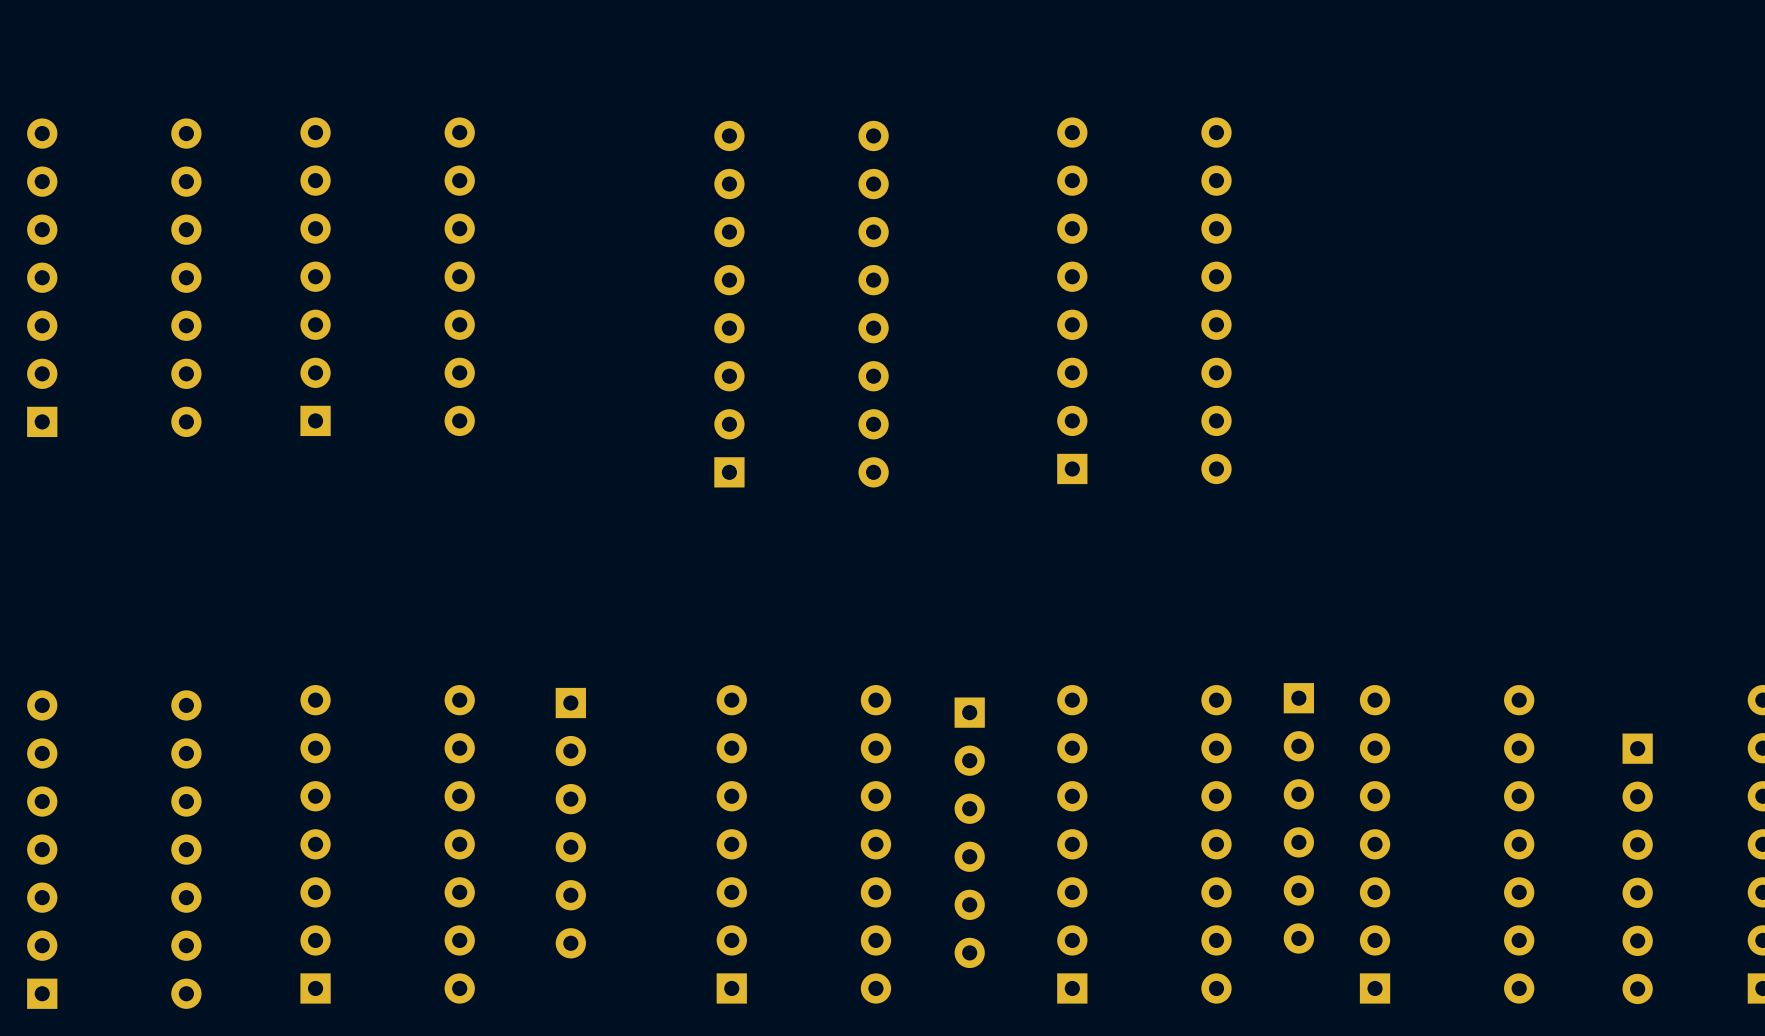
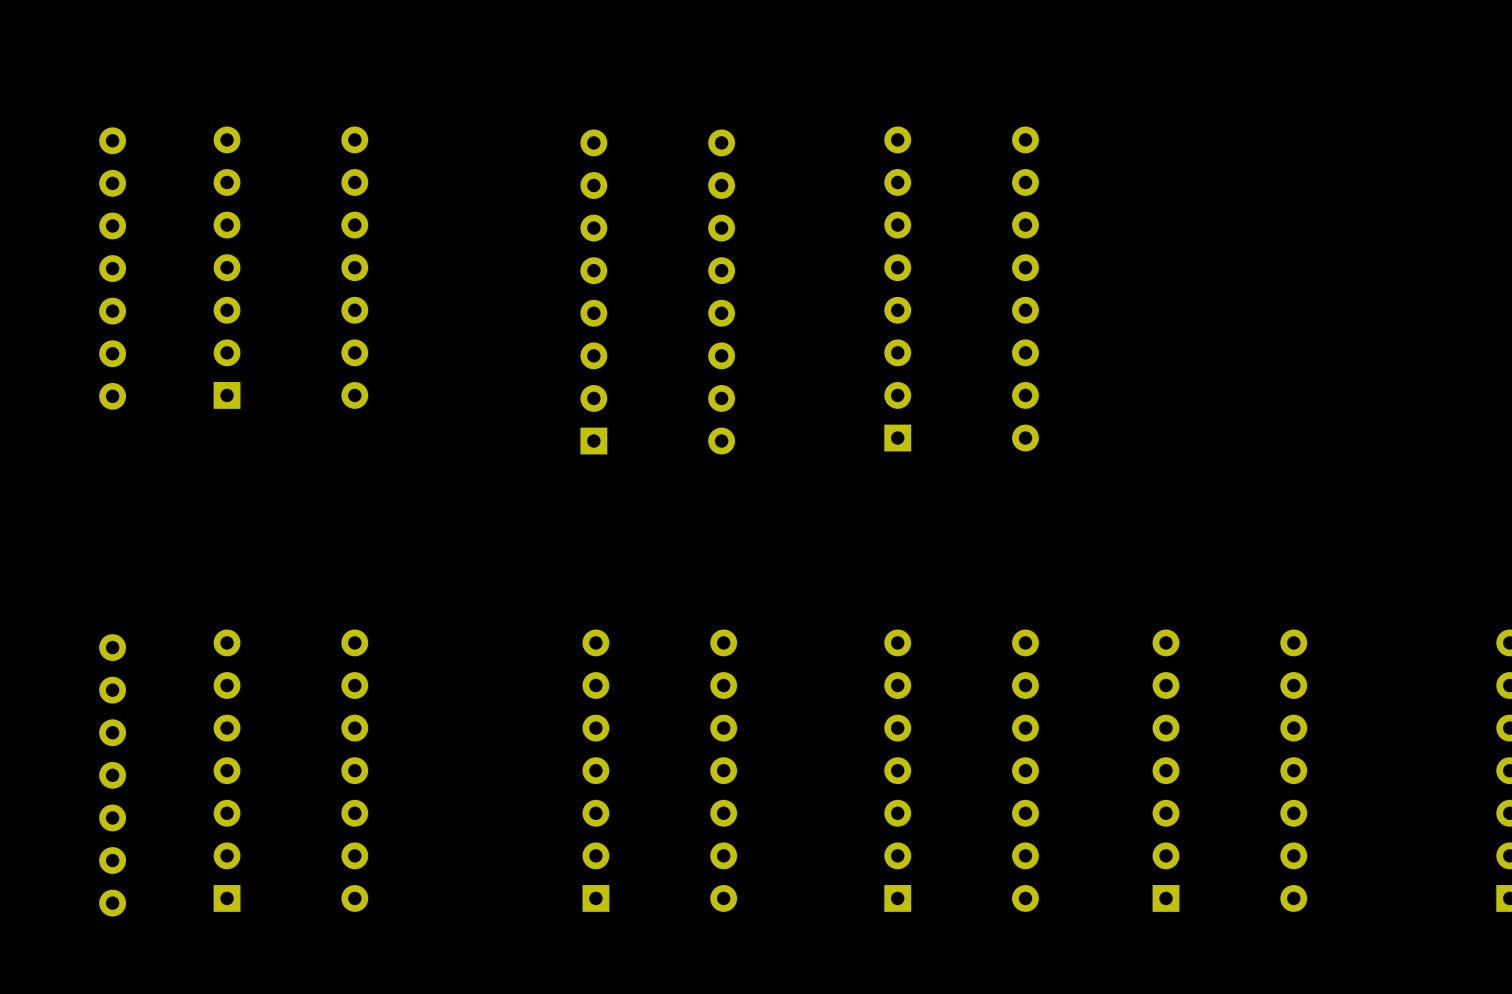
part: (1298, 818) -> none
part: (570, 823) -> none
part: (969, 832) -> none
part: (1637, 868) -> none

